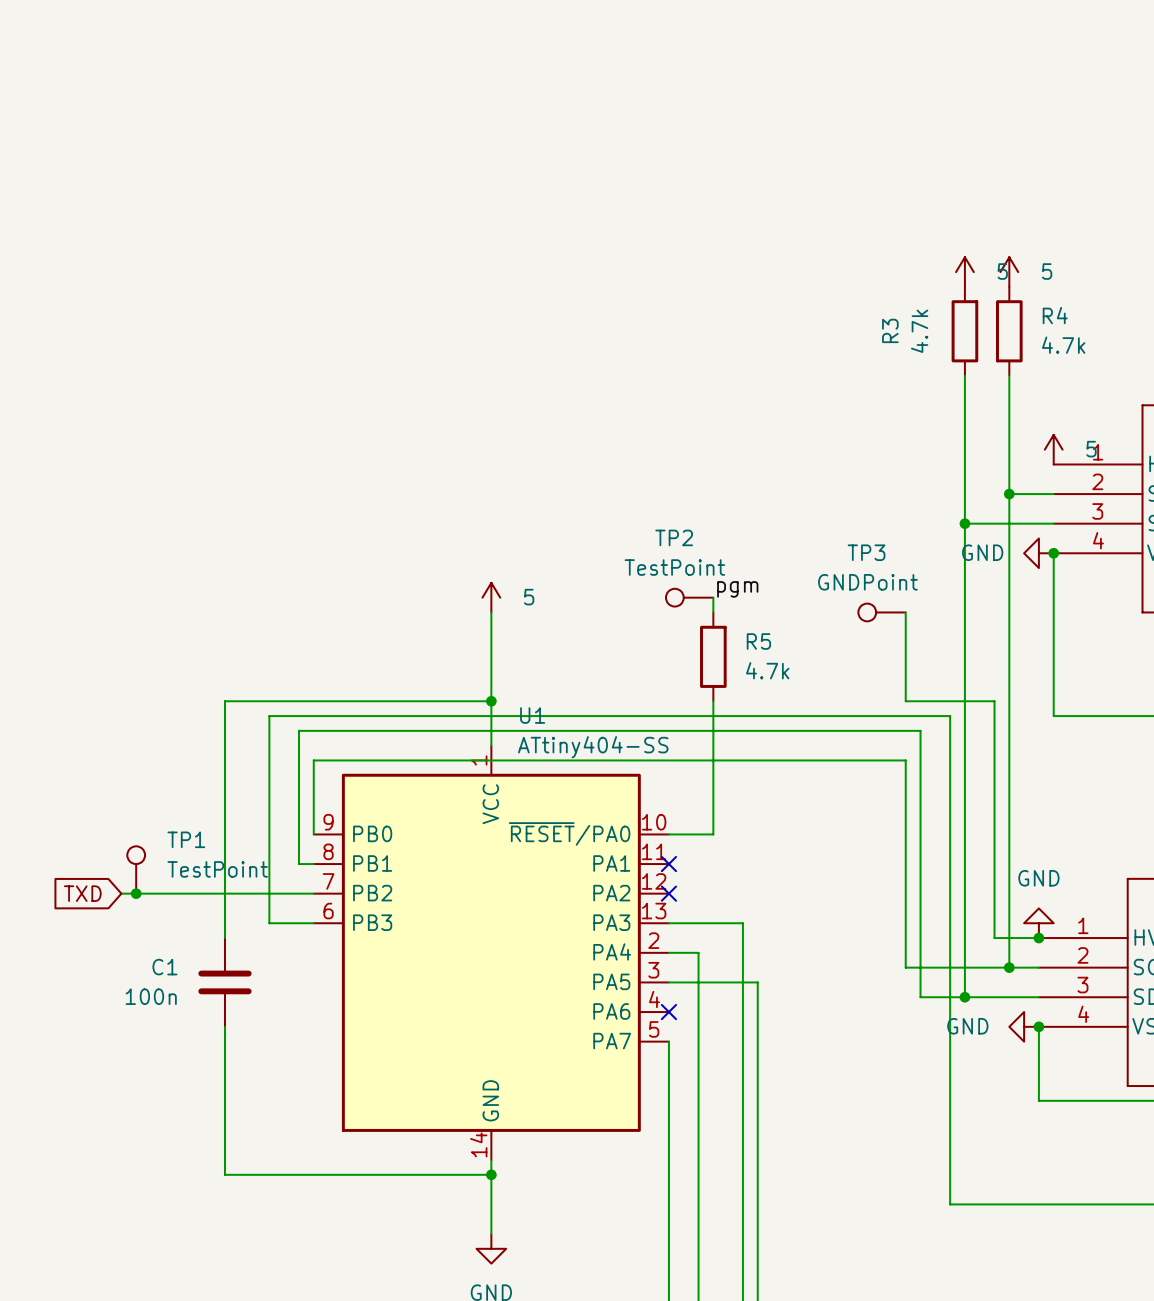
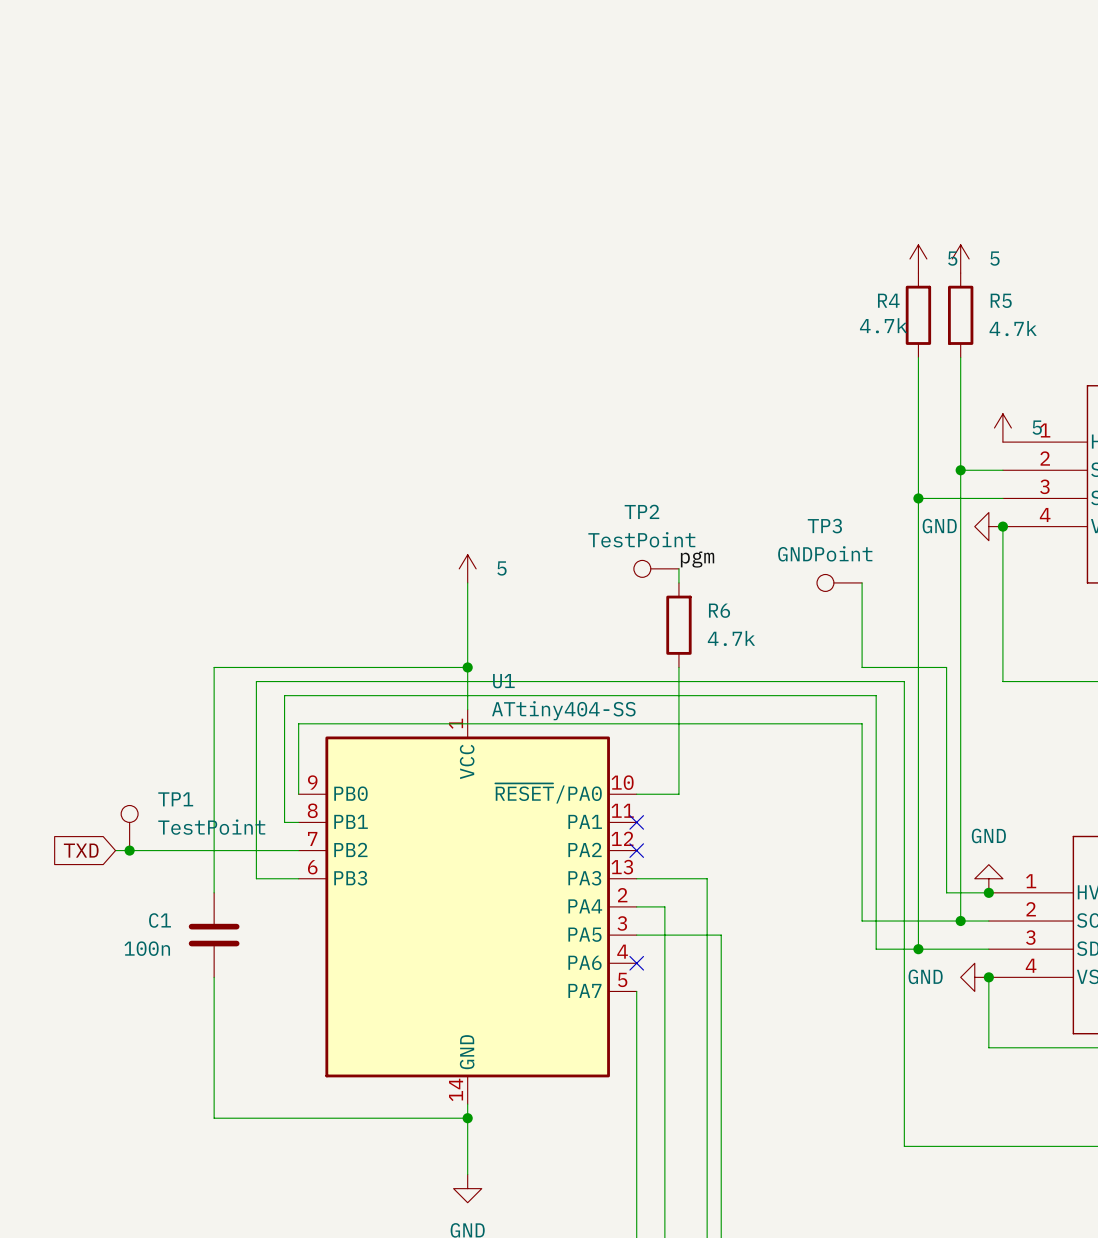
R4 name: R4 (1055, 315) -> R5 (1001, 300)
R3 name: R3 (890, 330) -> R4 (888, 300)
R3 value rotation: 0° (919, 331) -> 90° clockwise (883, 325)
R5 name: R5 (758, 641) -> R6 (719, 610)

